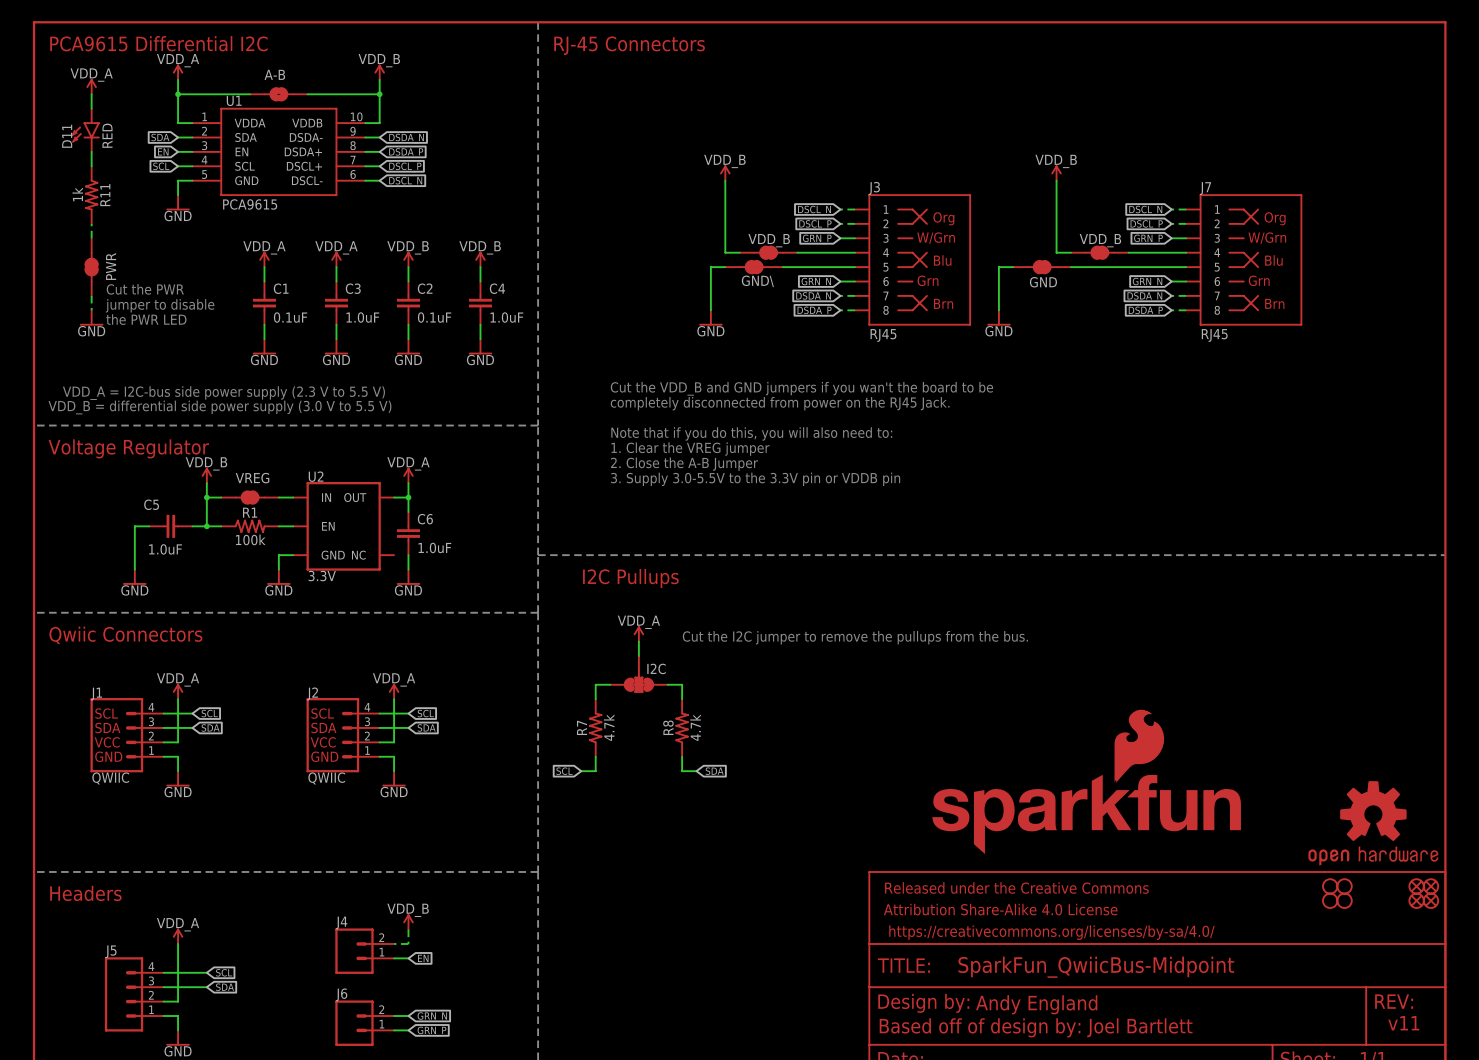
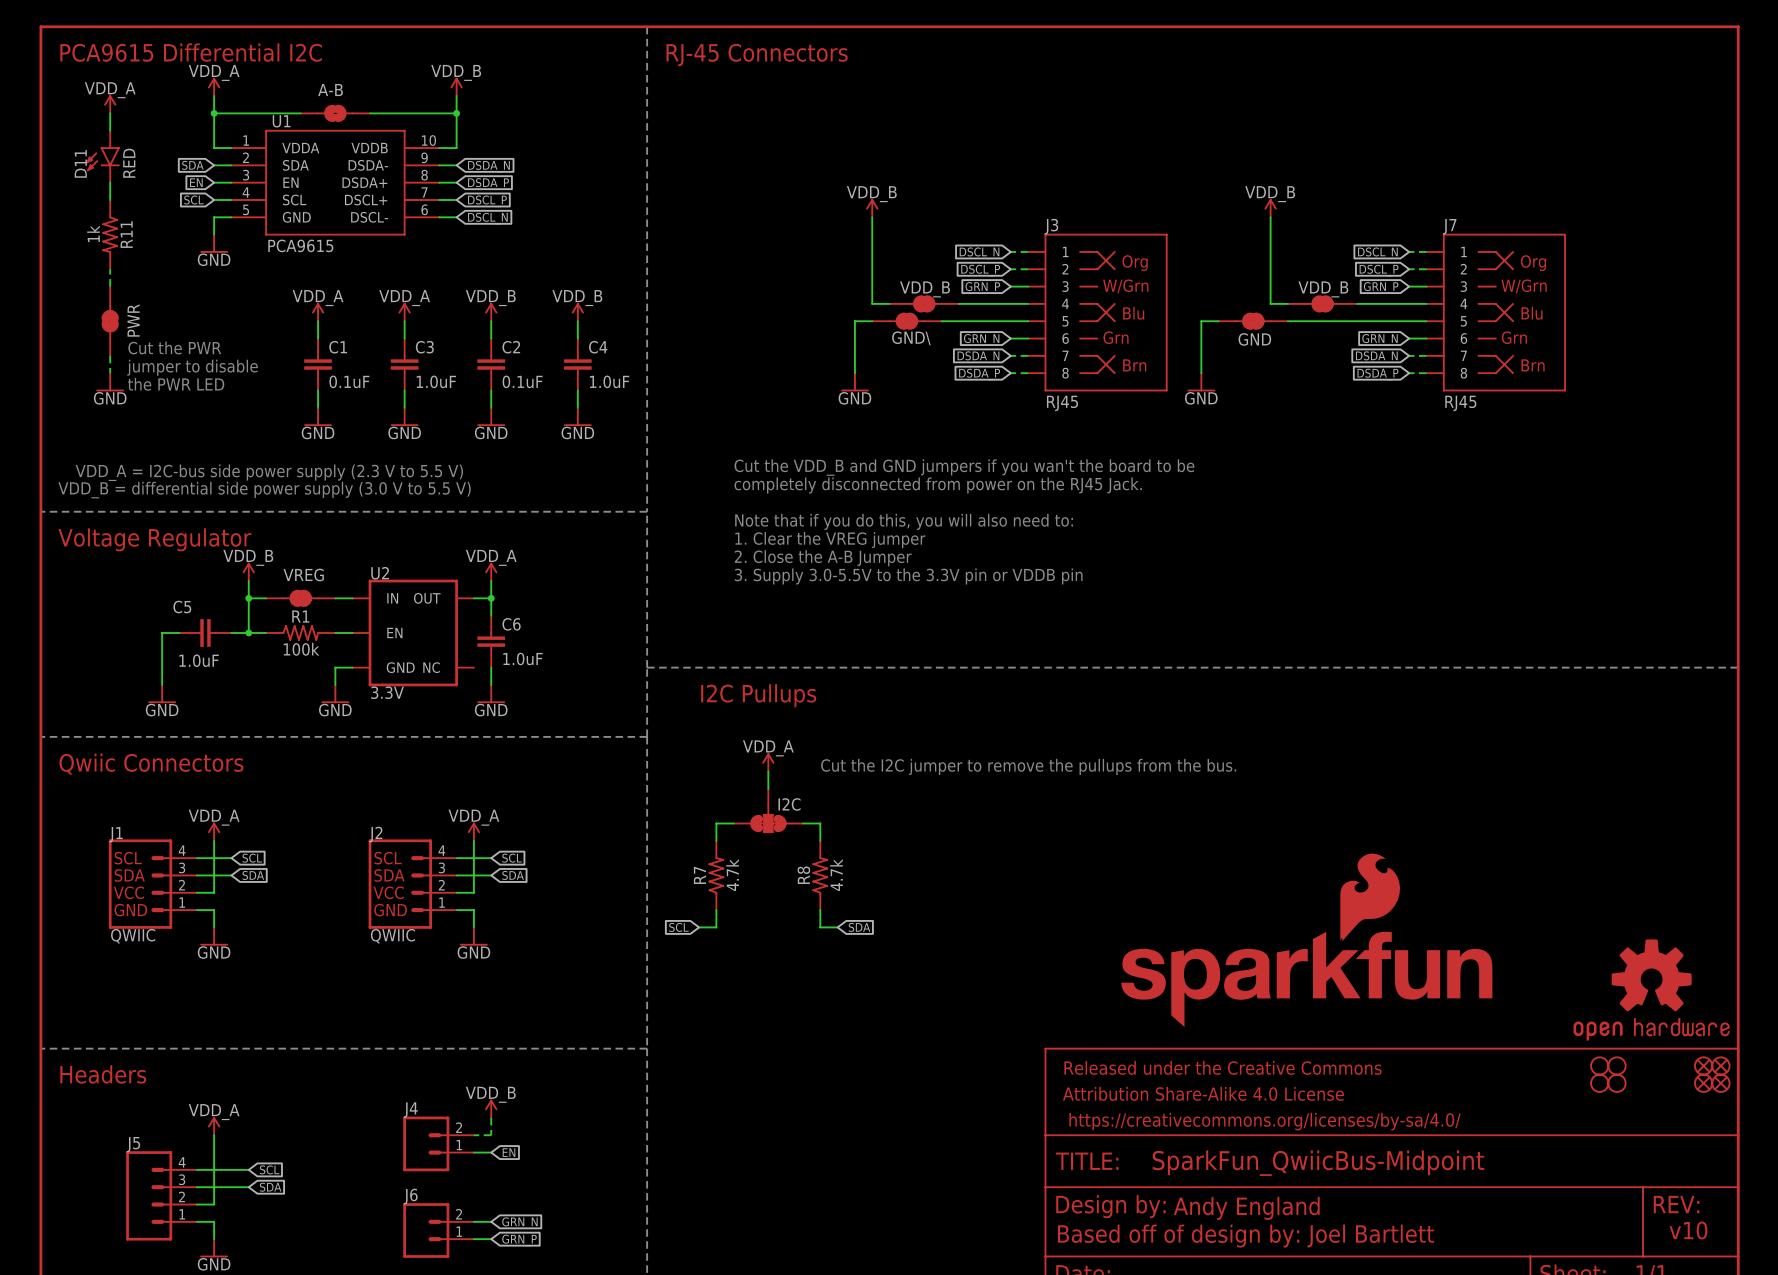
text: v11 (1403, 1023) -> v10 (1688, 1230)

